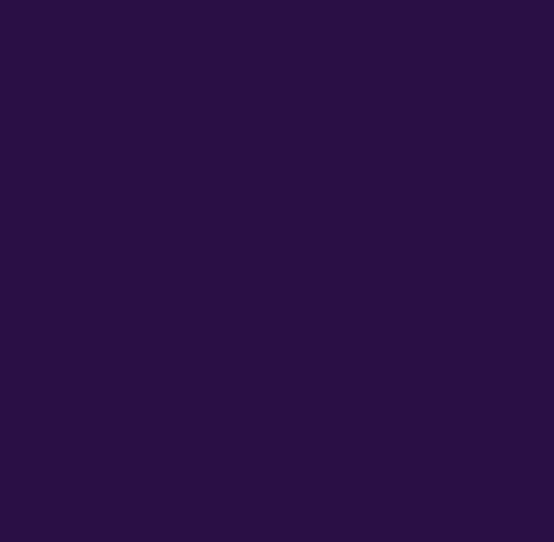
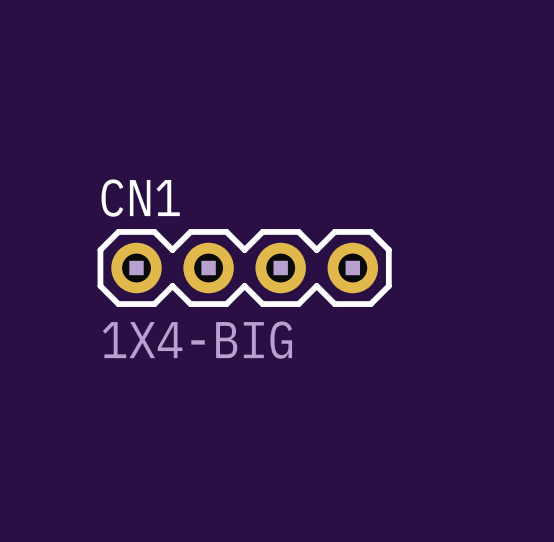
CN1: none -> 1X4-BIG (244, 268)

